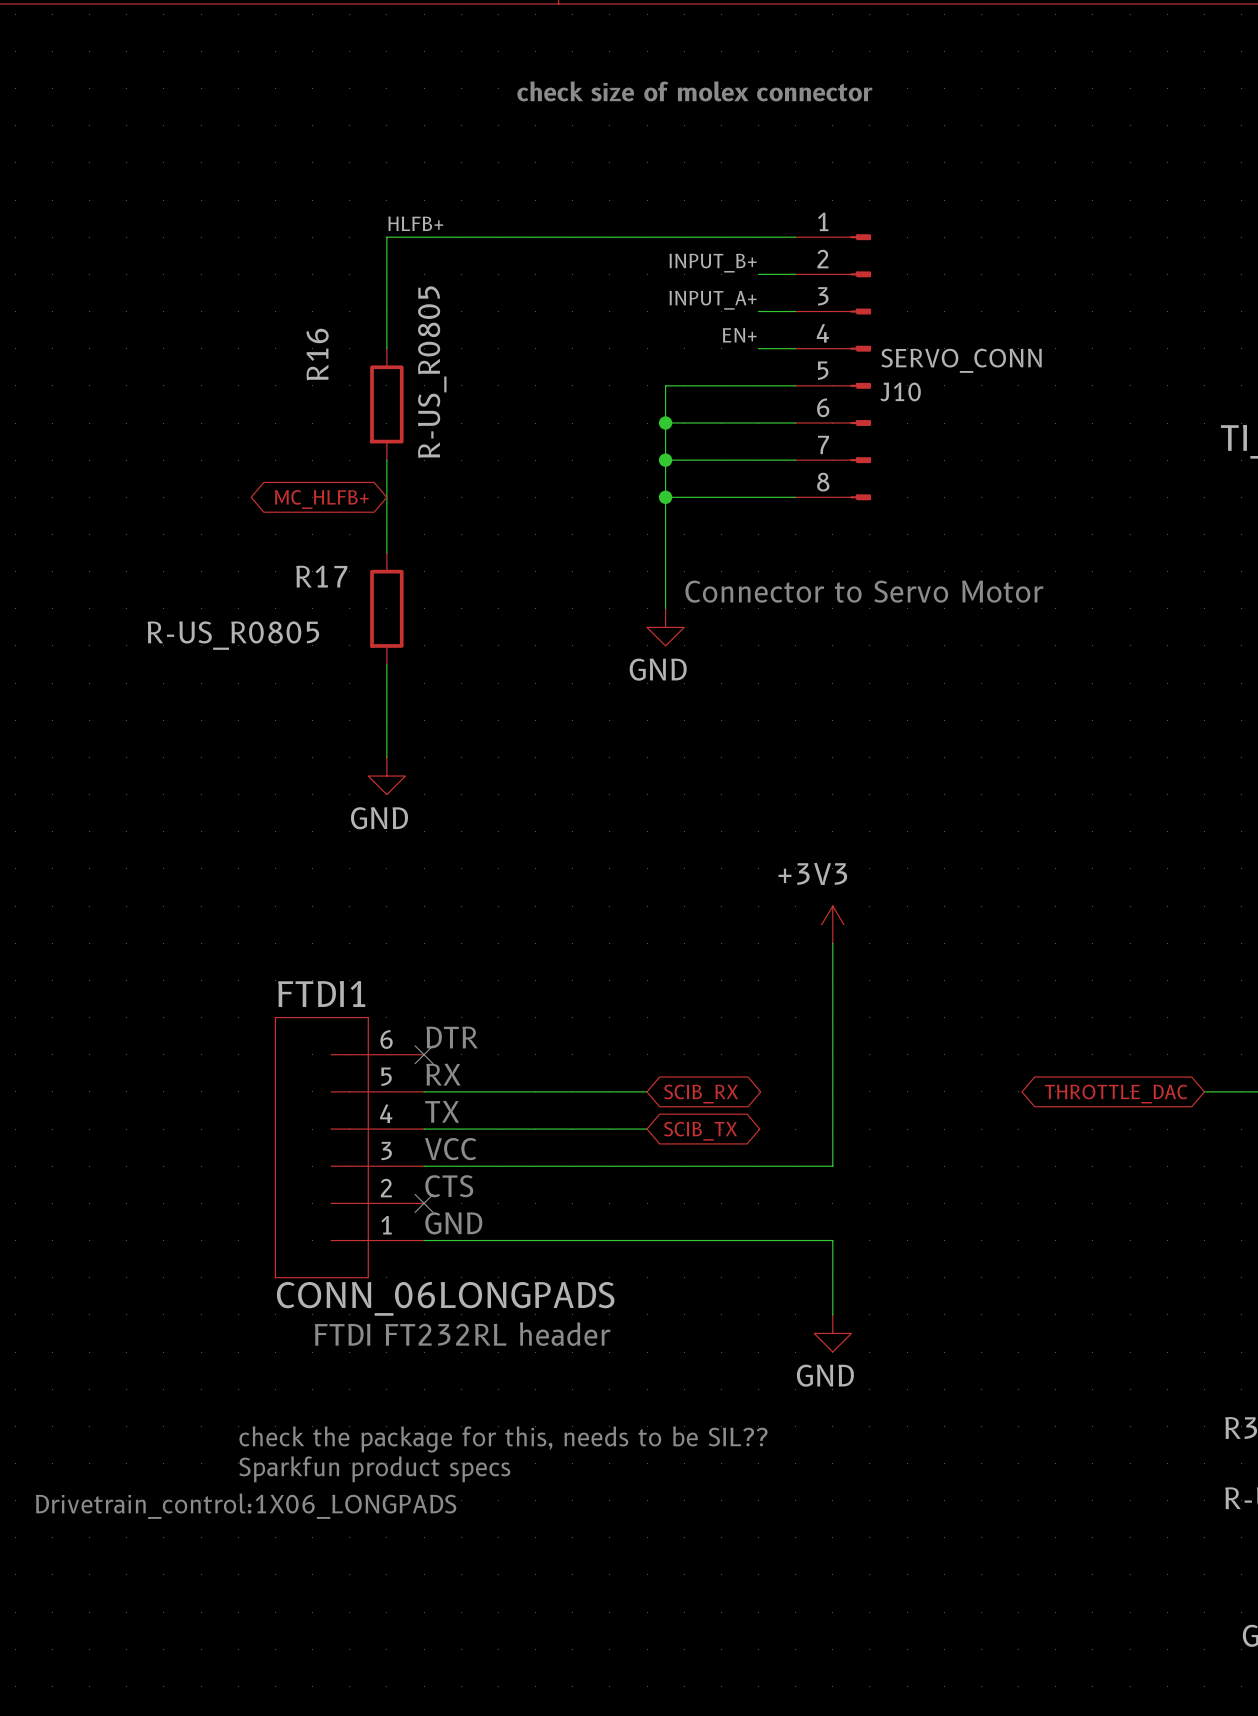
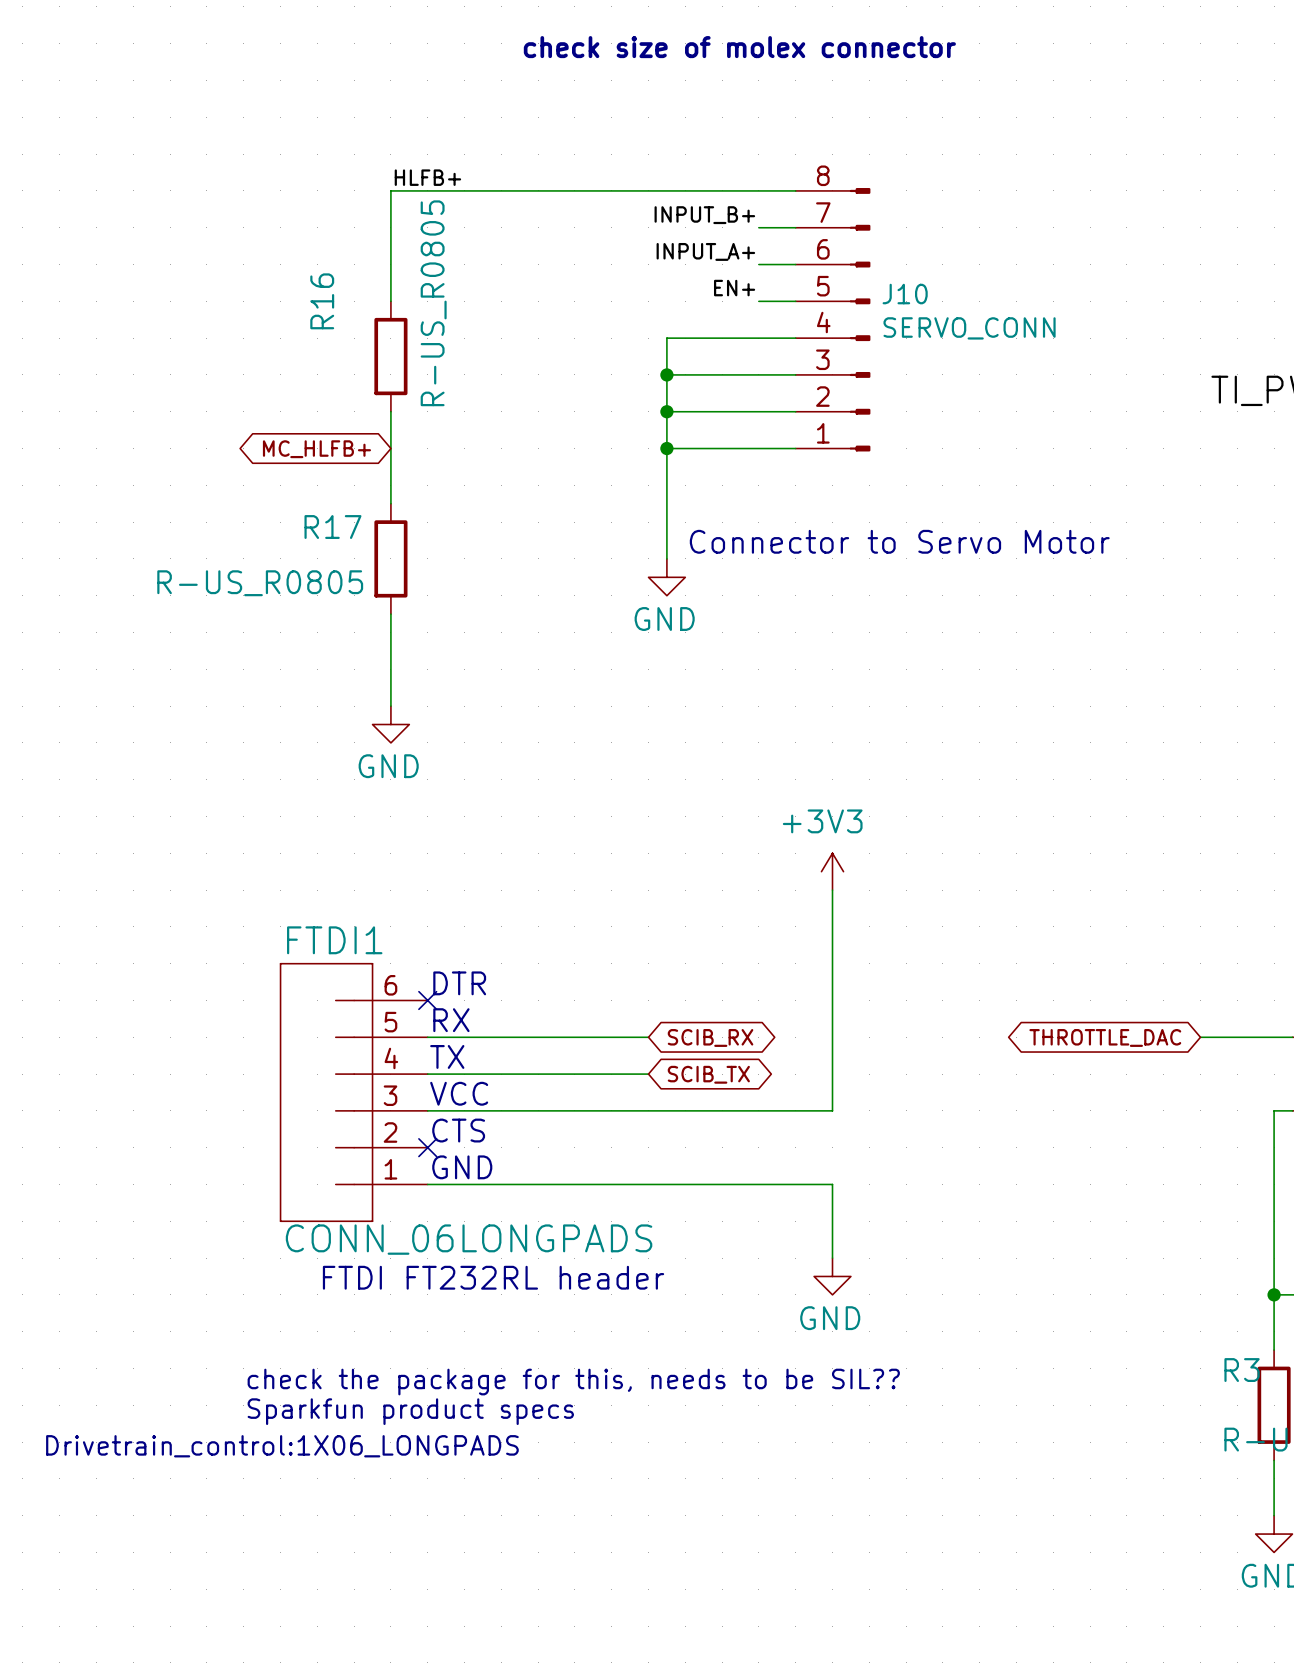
J10 flip: as is (860, 367) -> up-down (860, 319)

